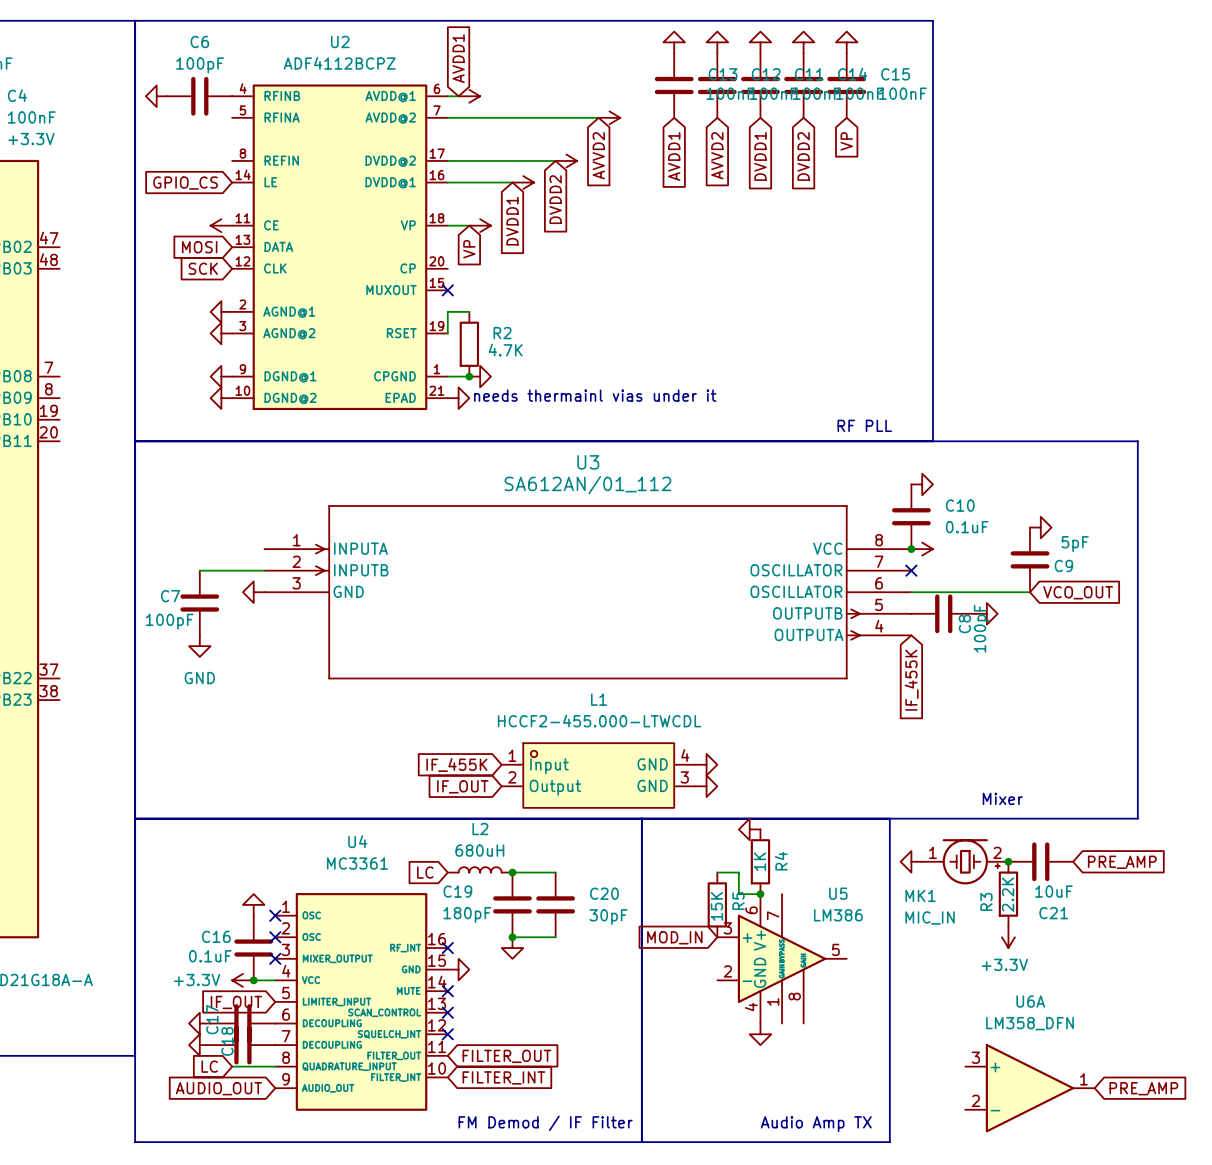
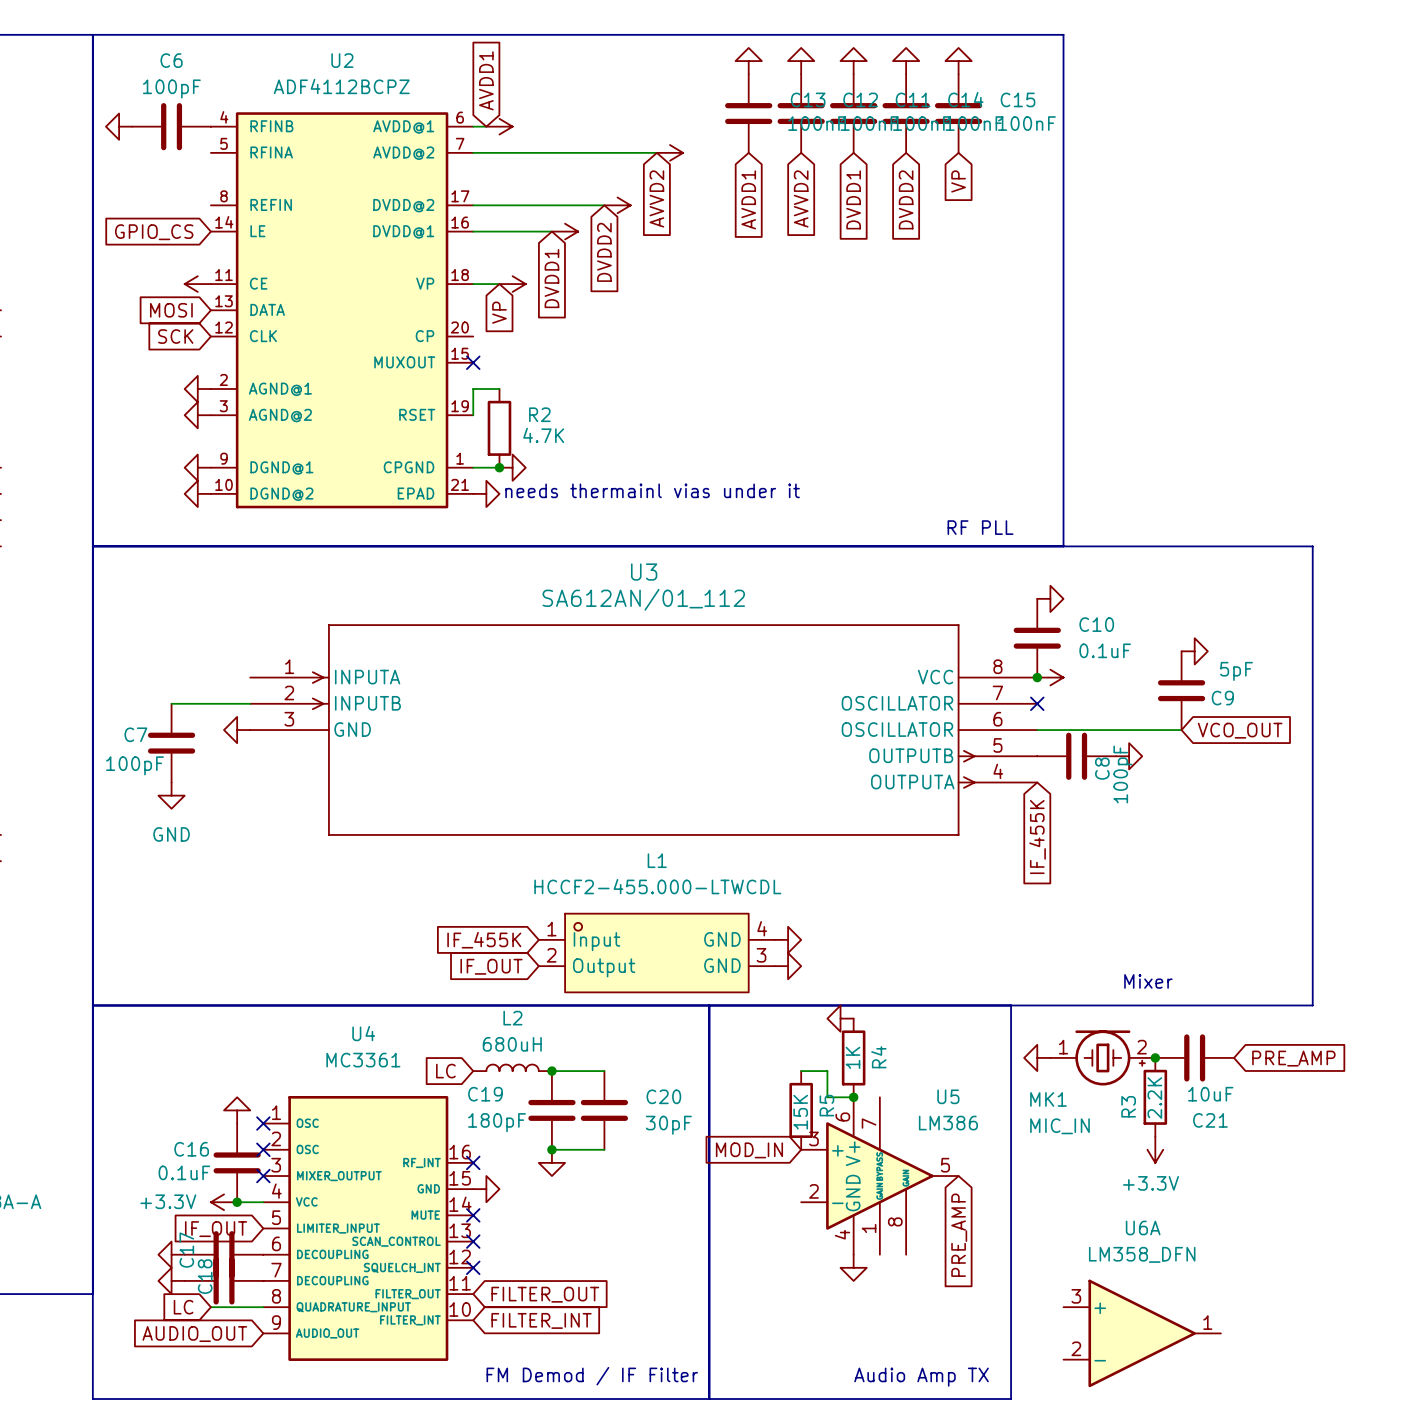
global label: none -> PRE_AMP (959, 1235)
U6A position: (1030, 1088) -> (1142, 1333)
global label: PRE_AMP (1143, 1088) -> none

